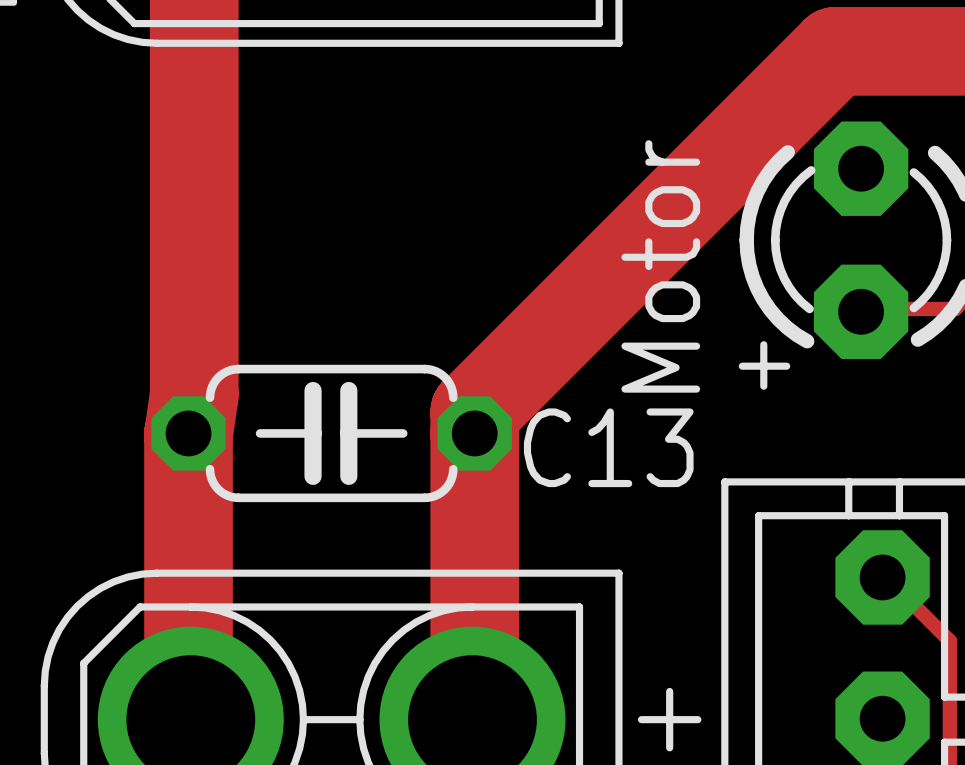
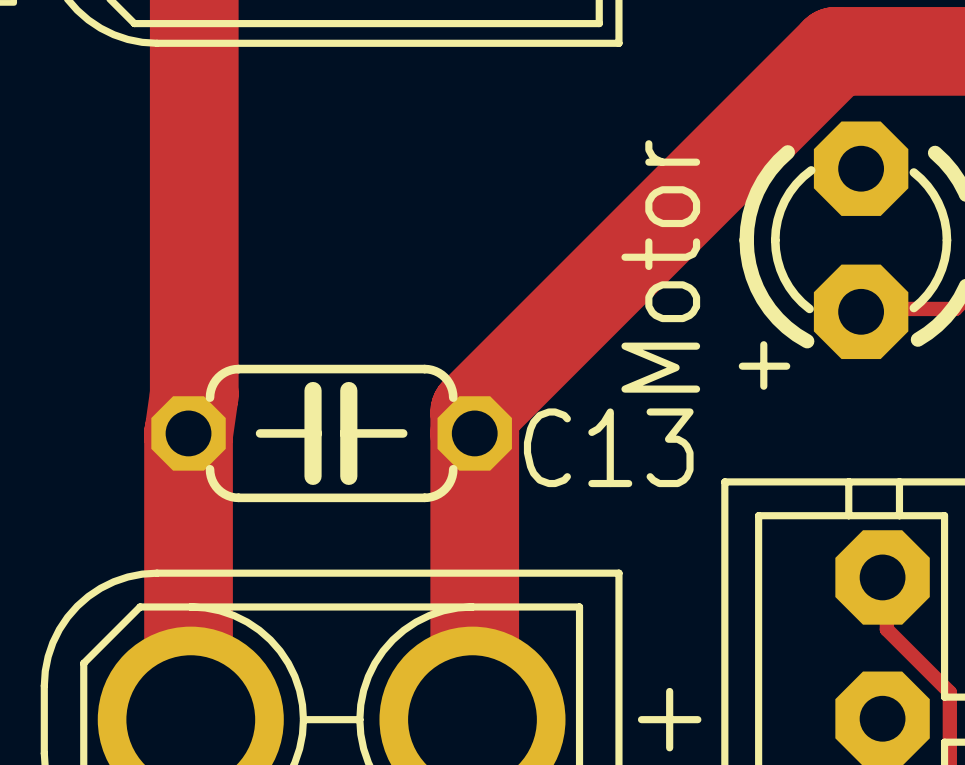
track: (886, 577) (949, 640) (949, 692) -> (886, 577) (886, 629) (949, 692)

